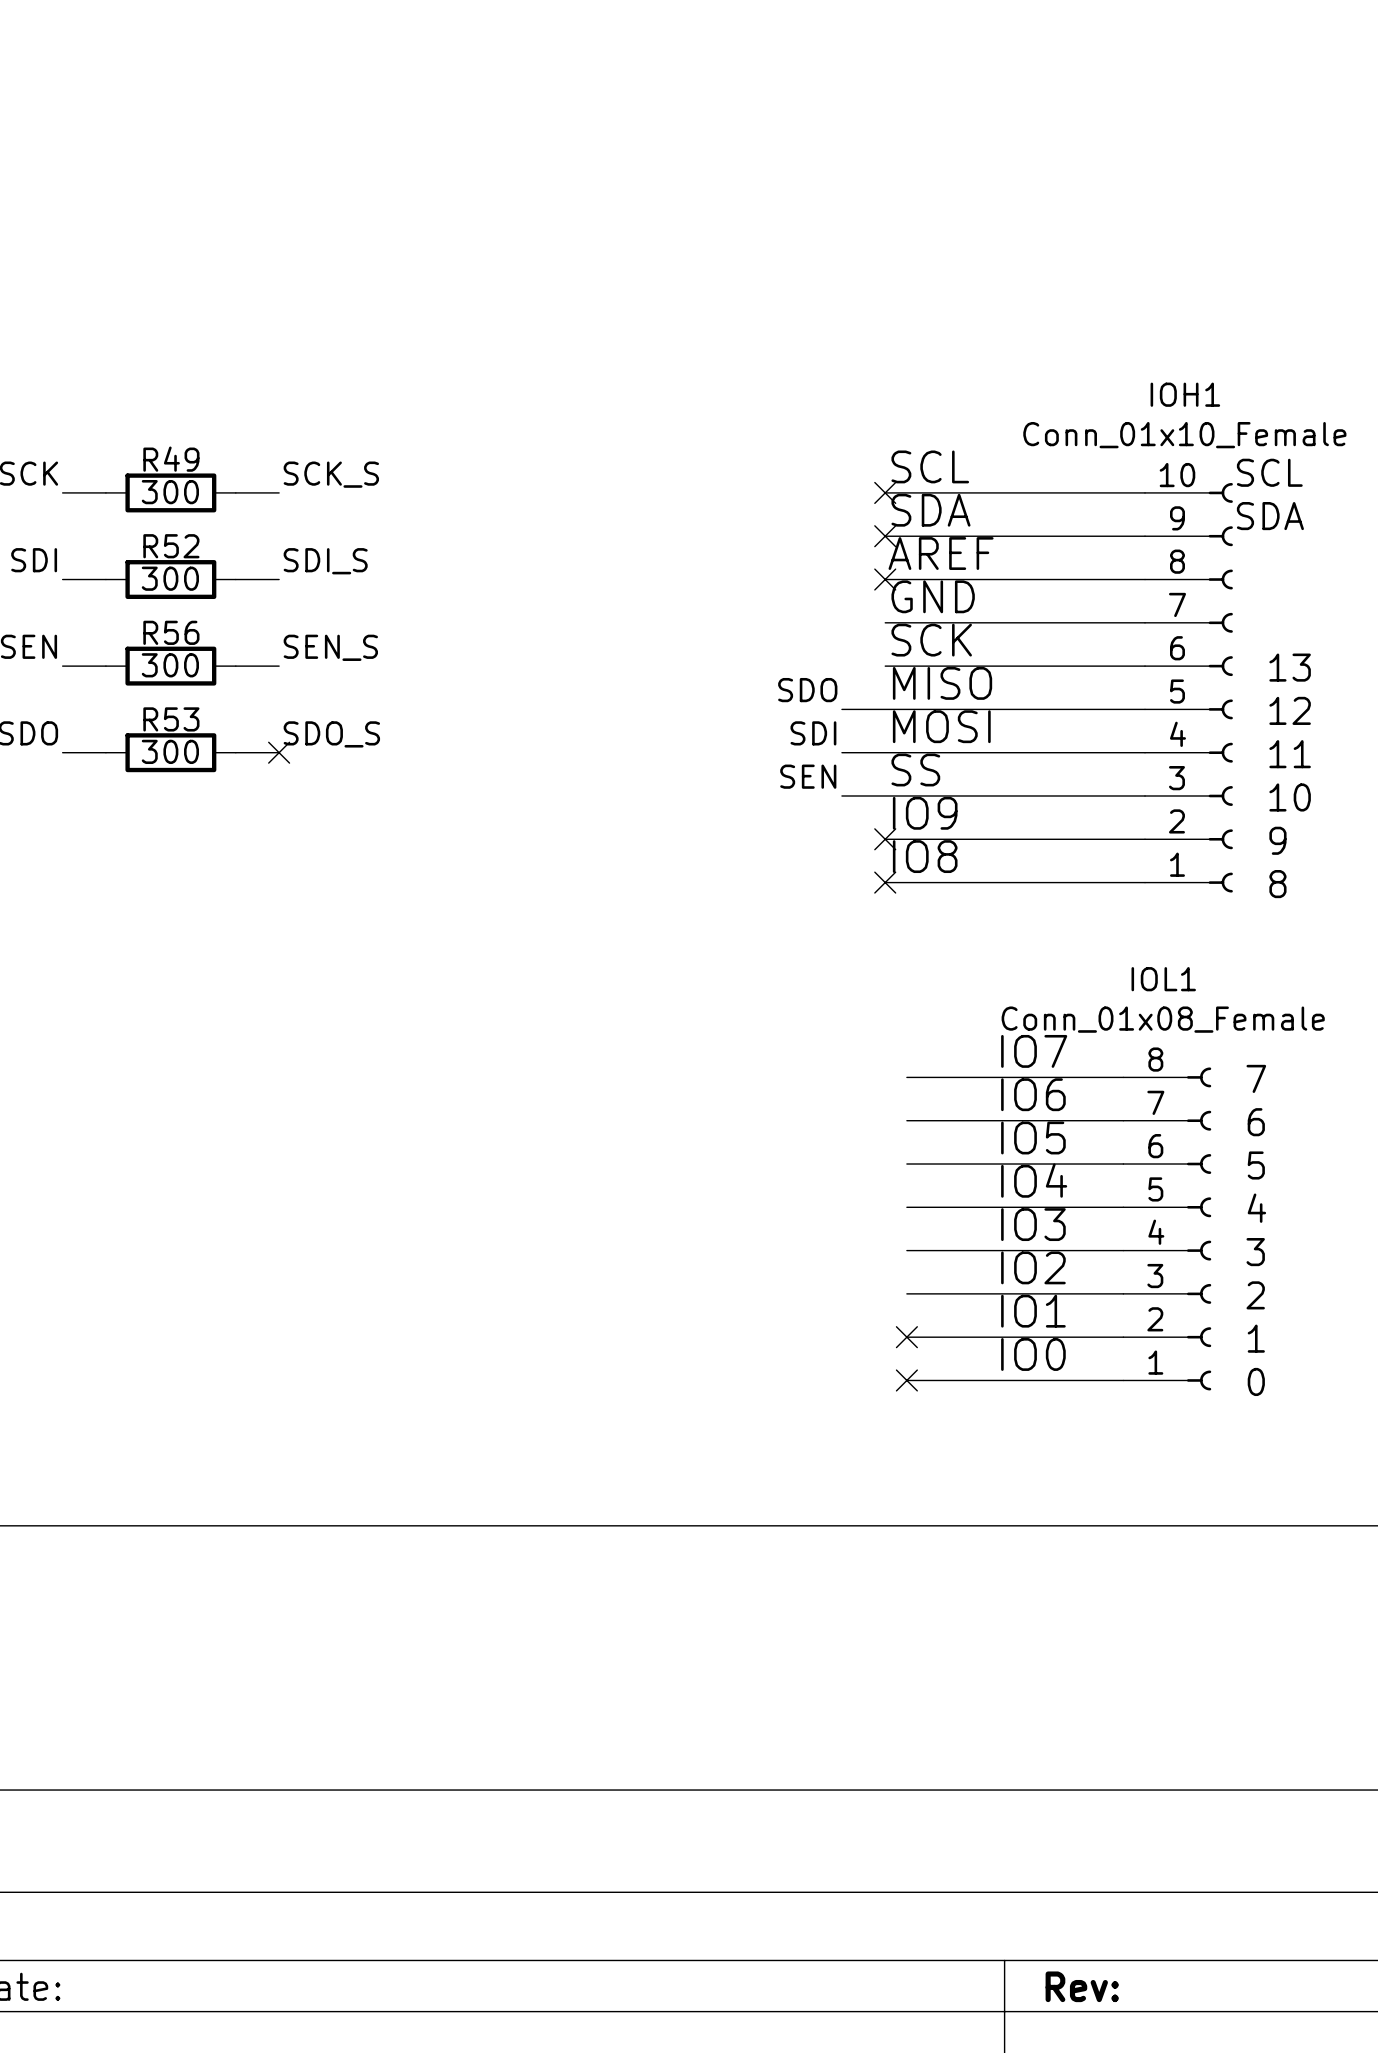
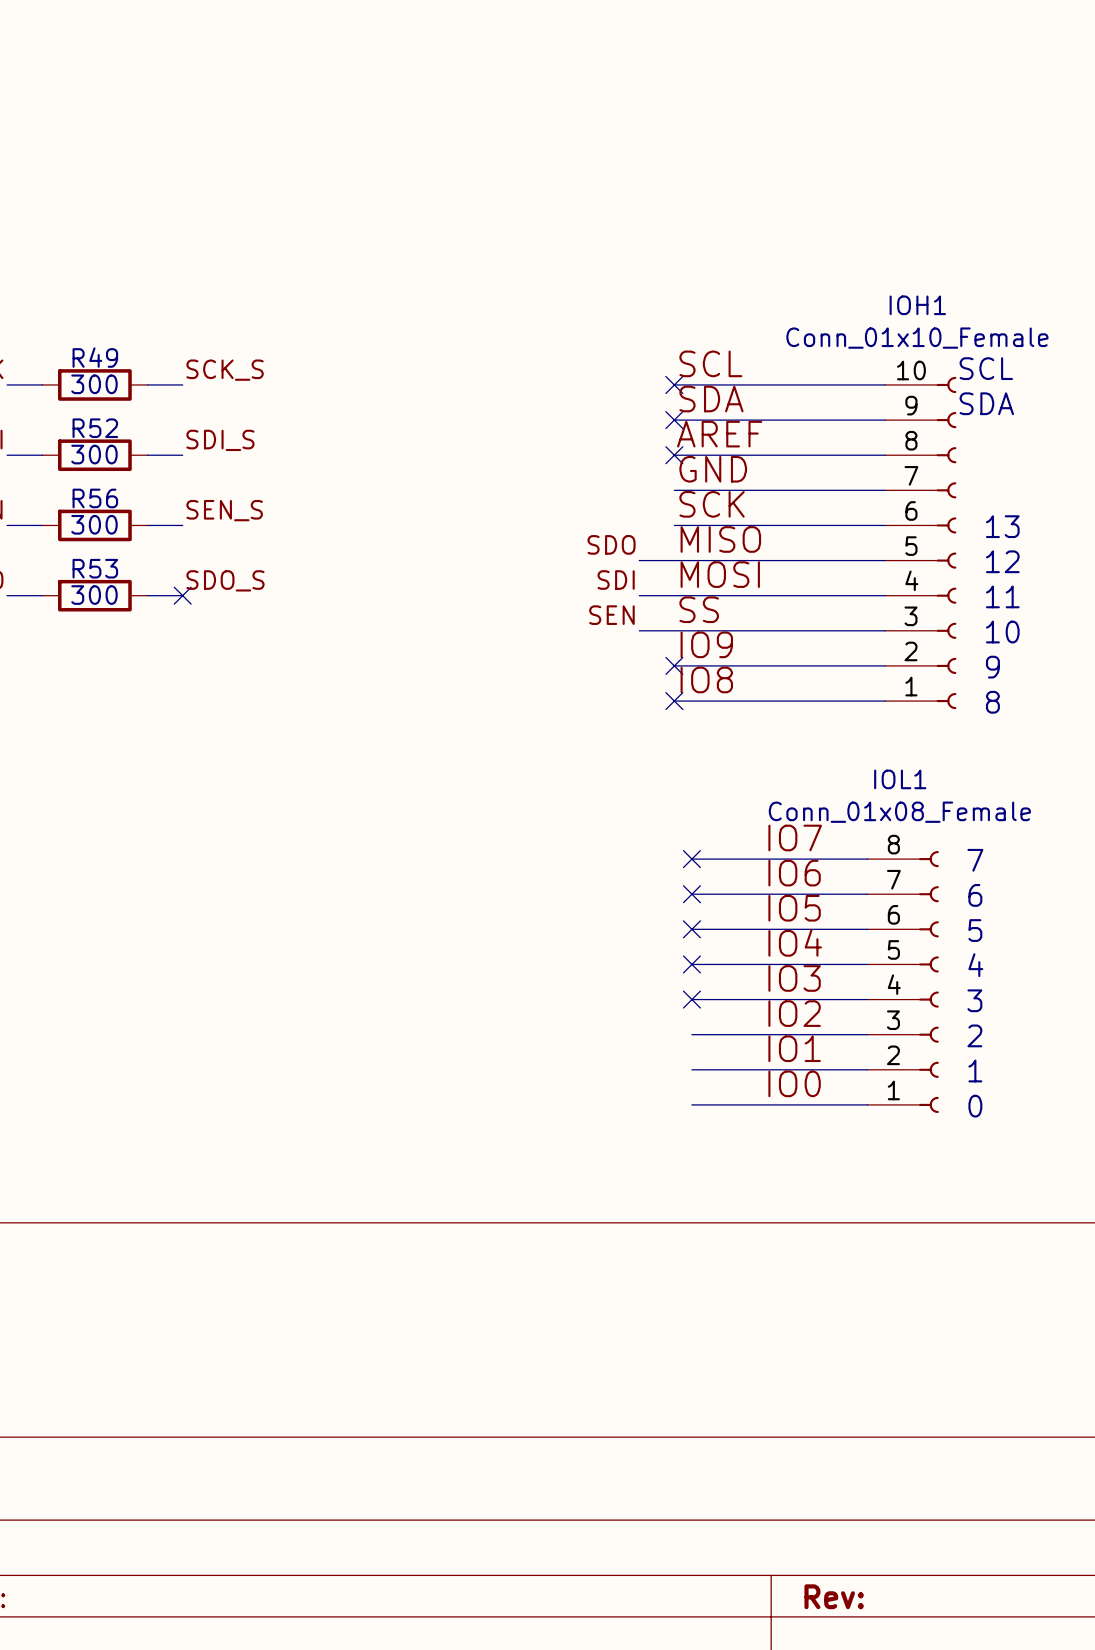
no-connect mark: none -> (691, 859)
no-connect mark: none -> (691, 894)
no-connect mark: none -> (691, 929)
no-connect mark: none -> (691, 964)
no-connect mark: none -> (691, 999)
no-connect mark: (906, 1337) -> none
no-connect mark: (906, 1380) -> none

